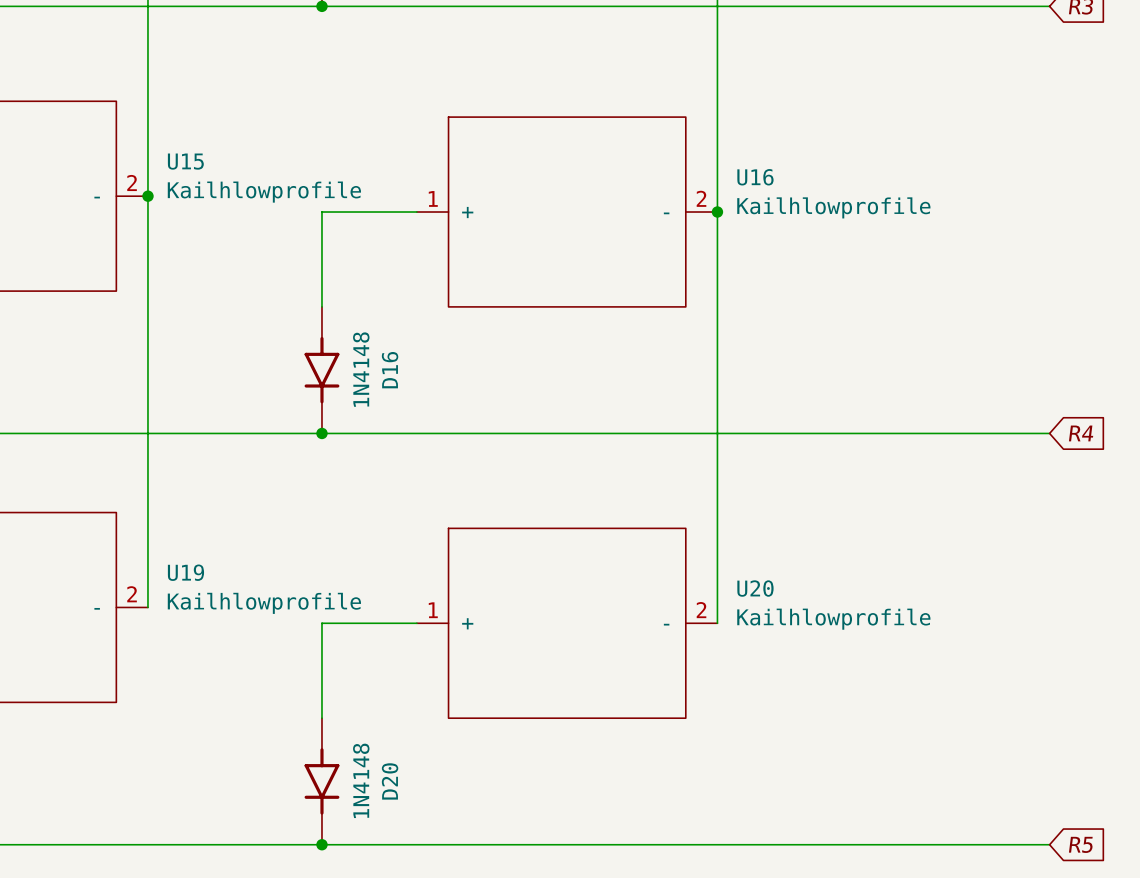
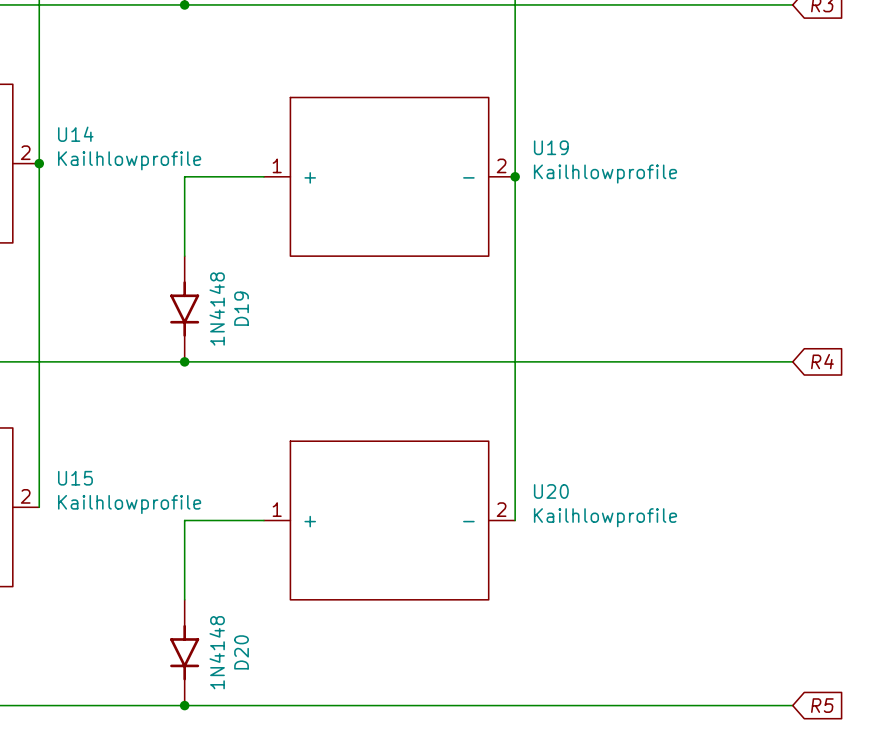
U15 name: U15 (185, 161) -> U14 (75, 134)
U16 name: U16 (755, 177) -> U19 (551, 147)
D16 name: D16 (390, 370) -> D19 (241, 308)
U19 name: U19 (185, 572) -> U15 (75, 478)

